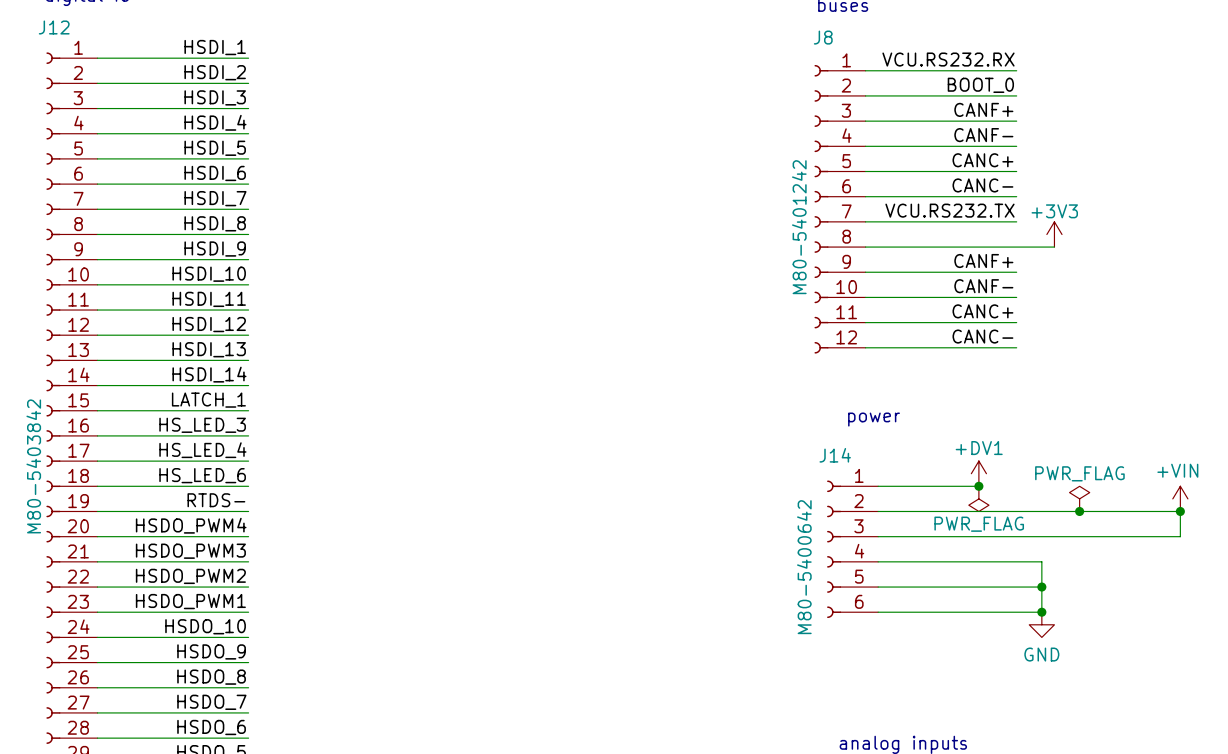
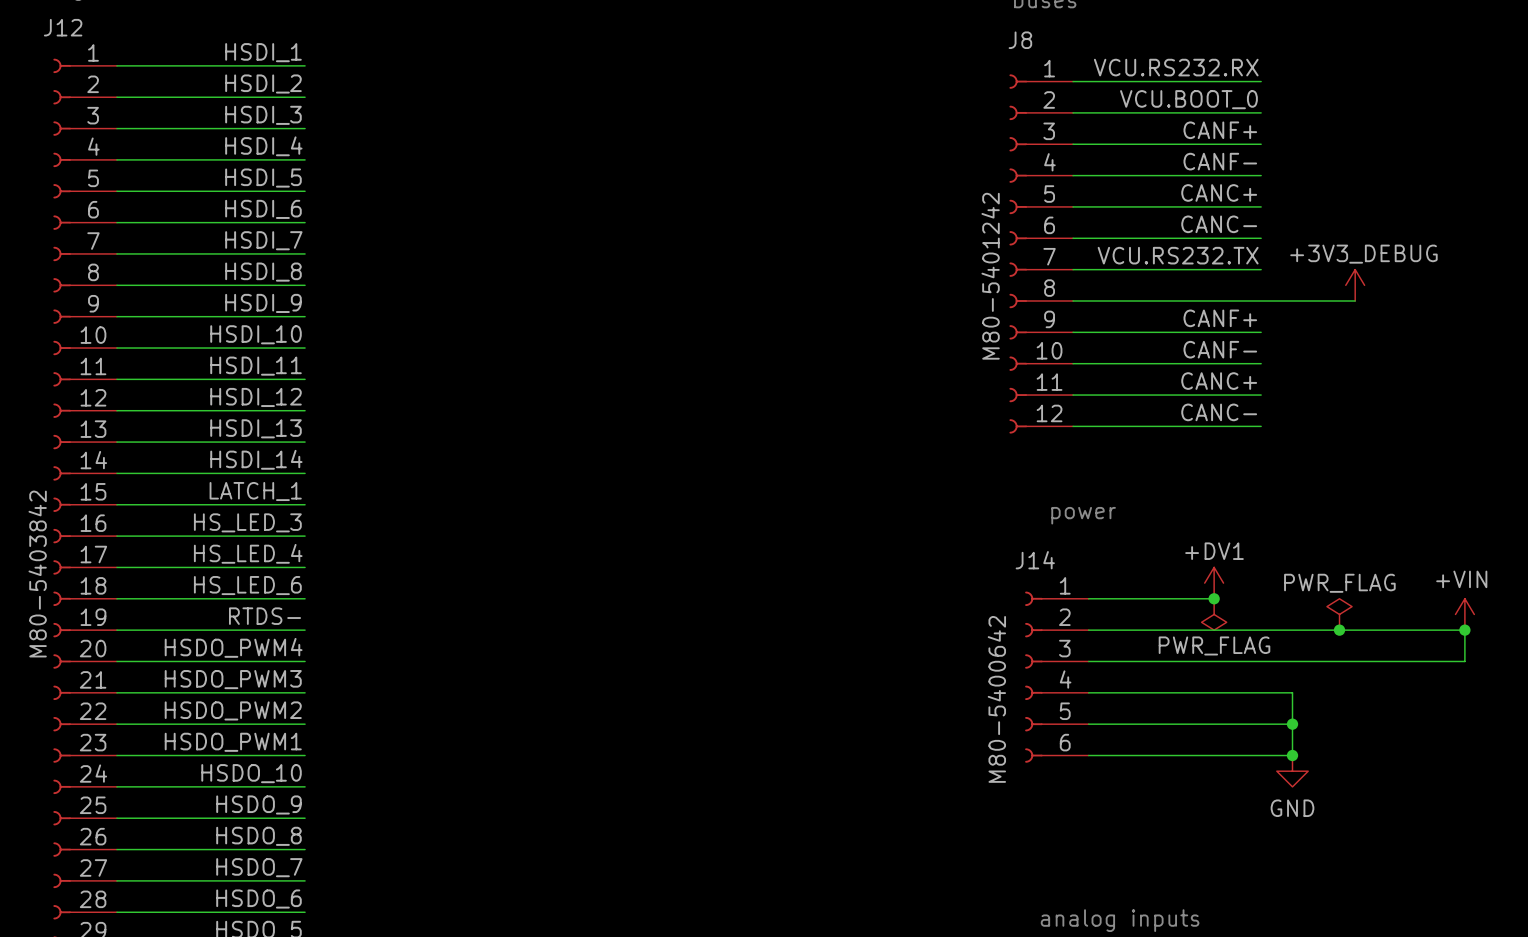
label: BOOT_0 (980, 85) -> VCU.BOOT_0 (1188, 99)
power symbol: +3V3 (1054, 234) -> none
power symbol: none -> +3V3_DEBUG (1355, 285)
wire: none -> (1308, 300) (1355, 300)

